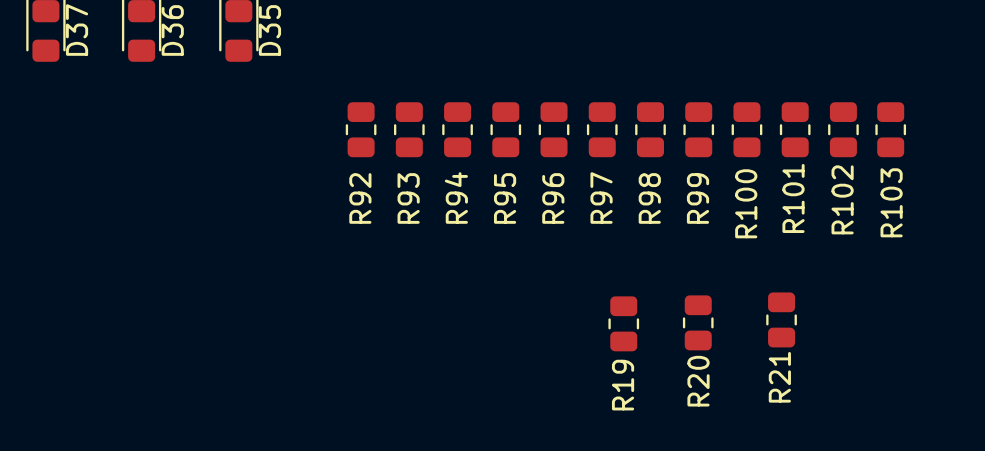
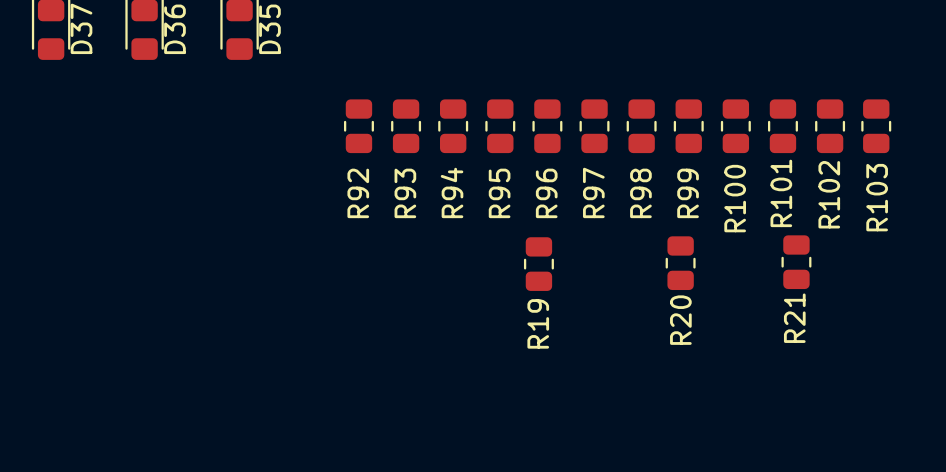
R21 position: (781, 319) -> (796, 262)
R20 position: (698, 322) -> (680, 263)
R19 position: (623, 323) -> (538, 264)

